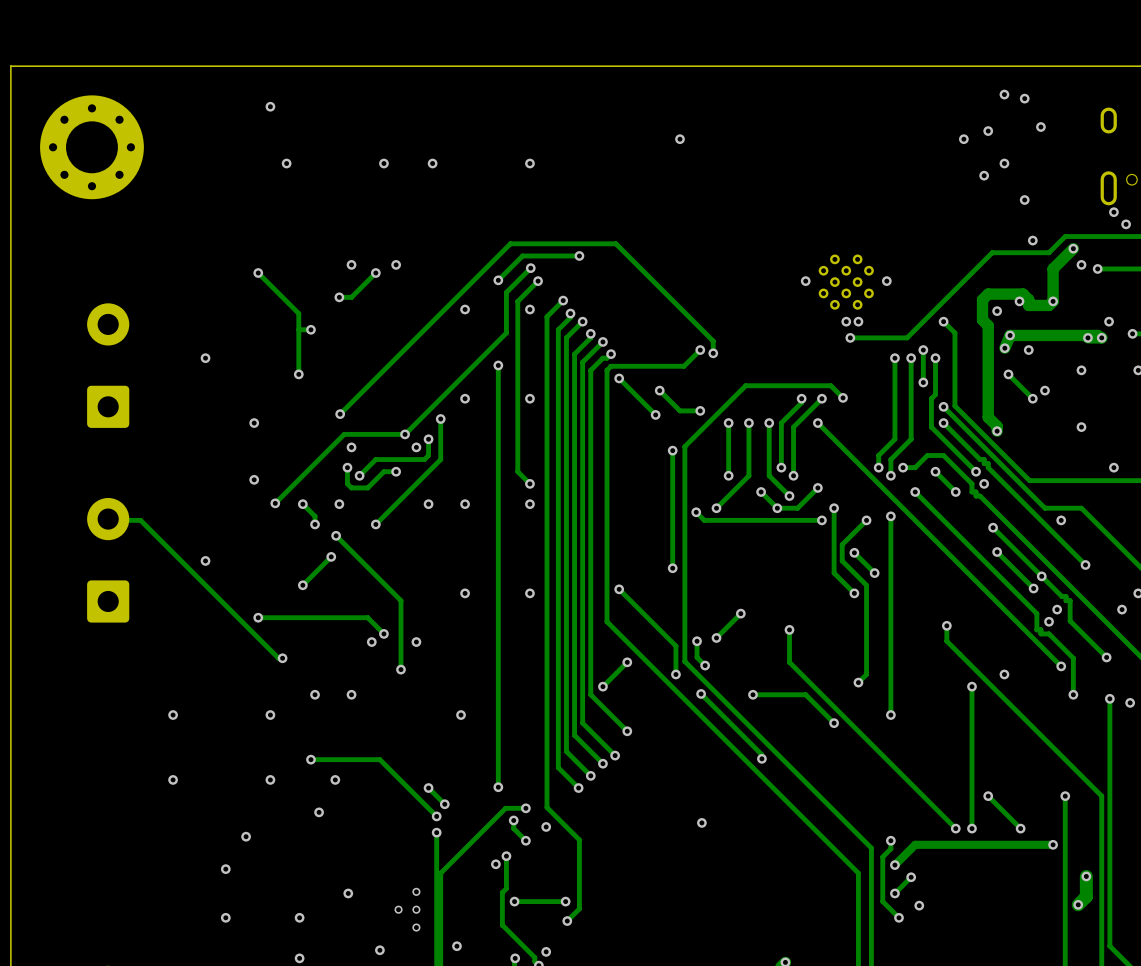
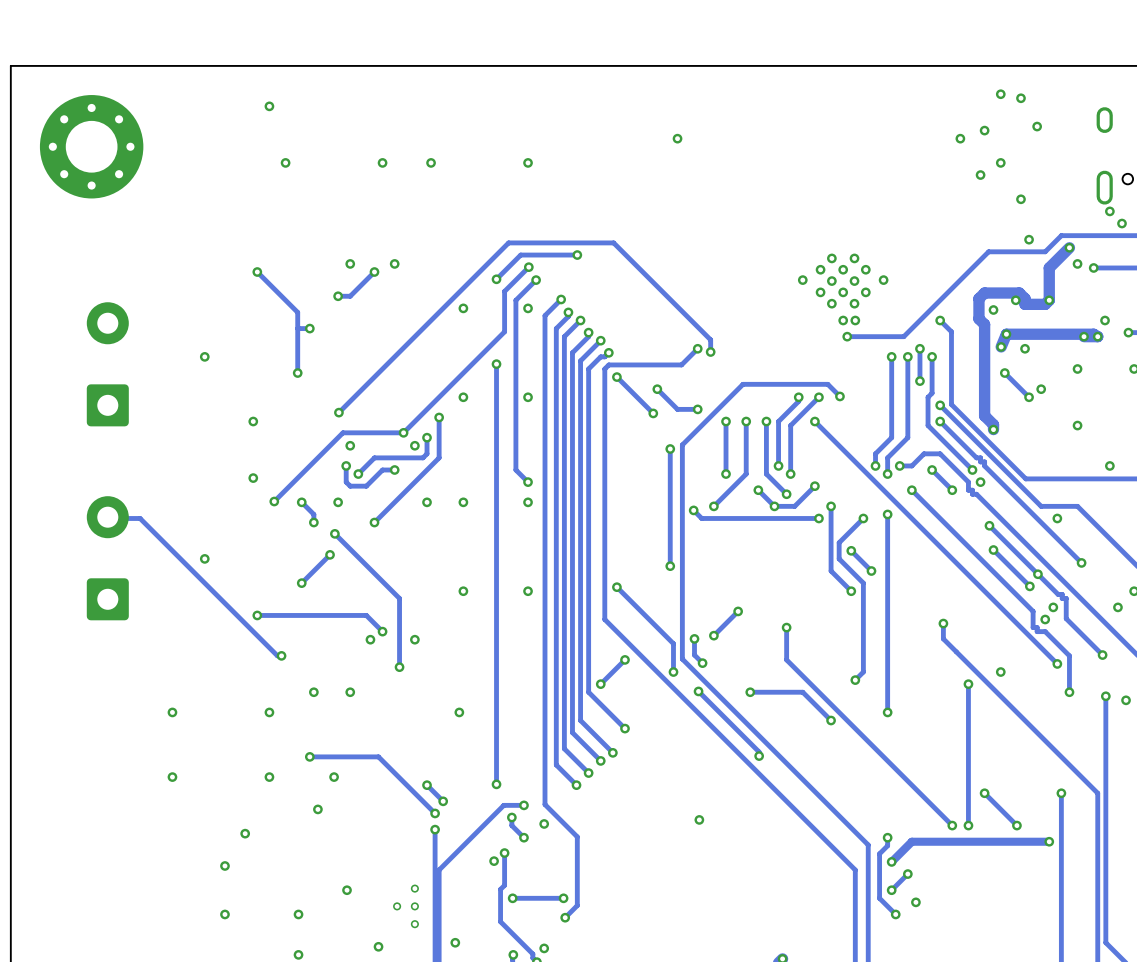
track: (1086, 876) (1086, 896) (1078, 904) -> none
via: (1086, 876) -> none
via: (1078, 904) -> none

